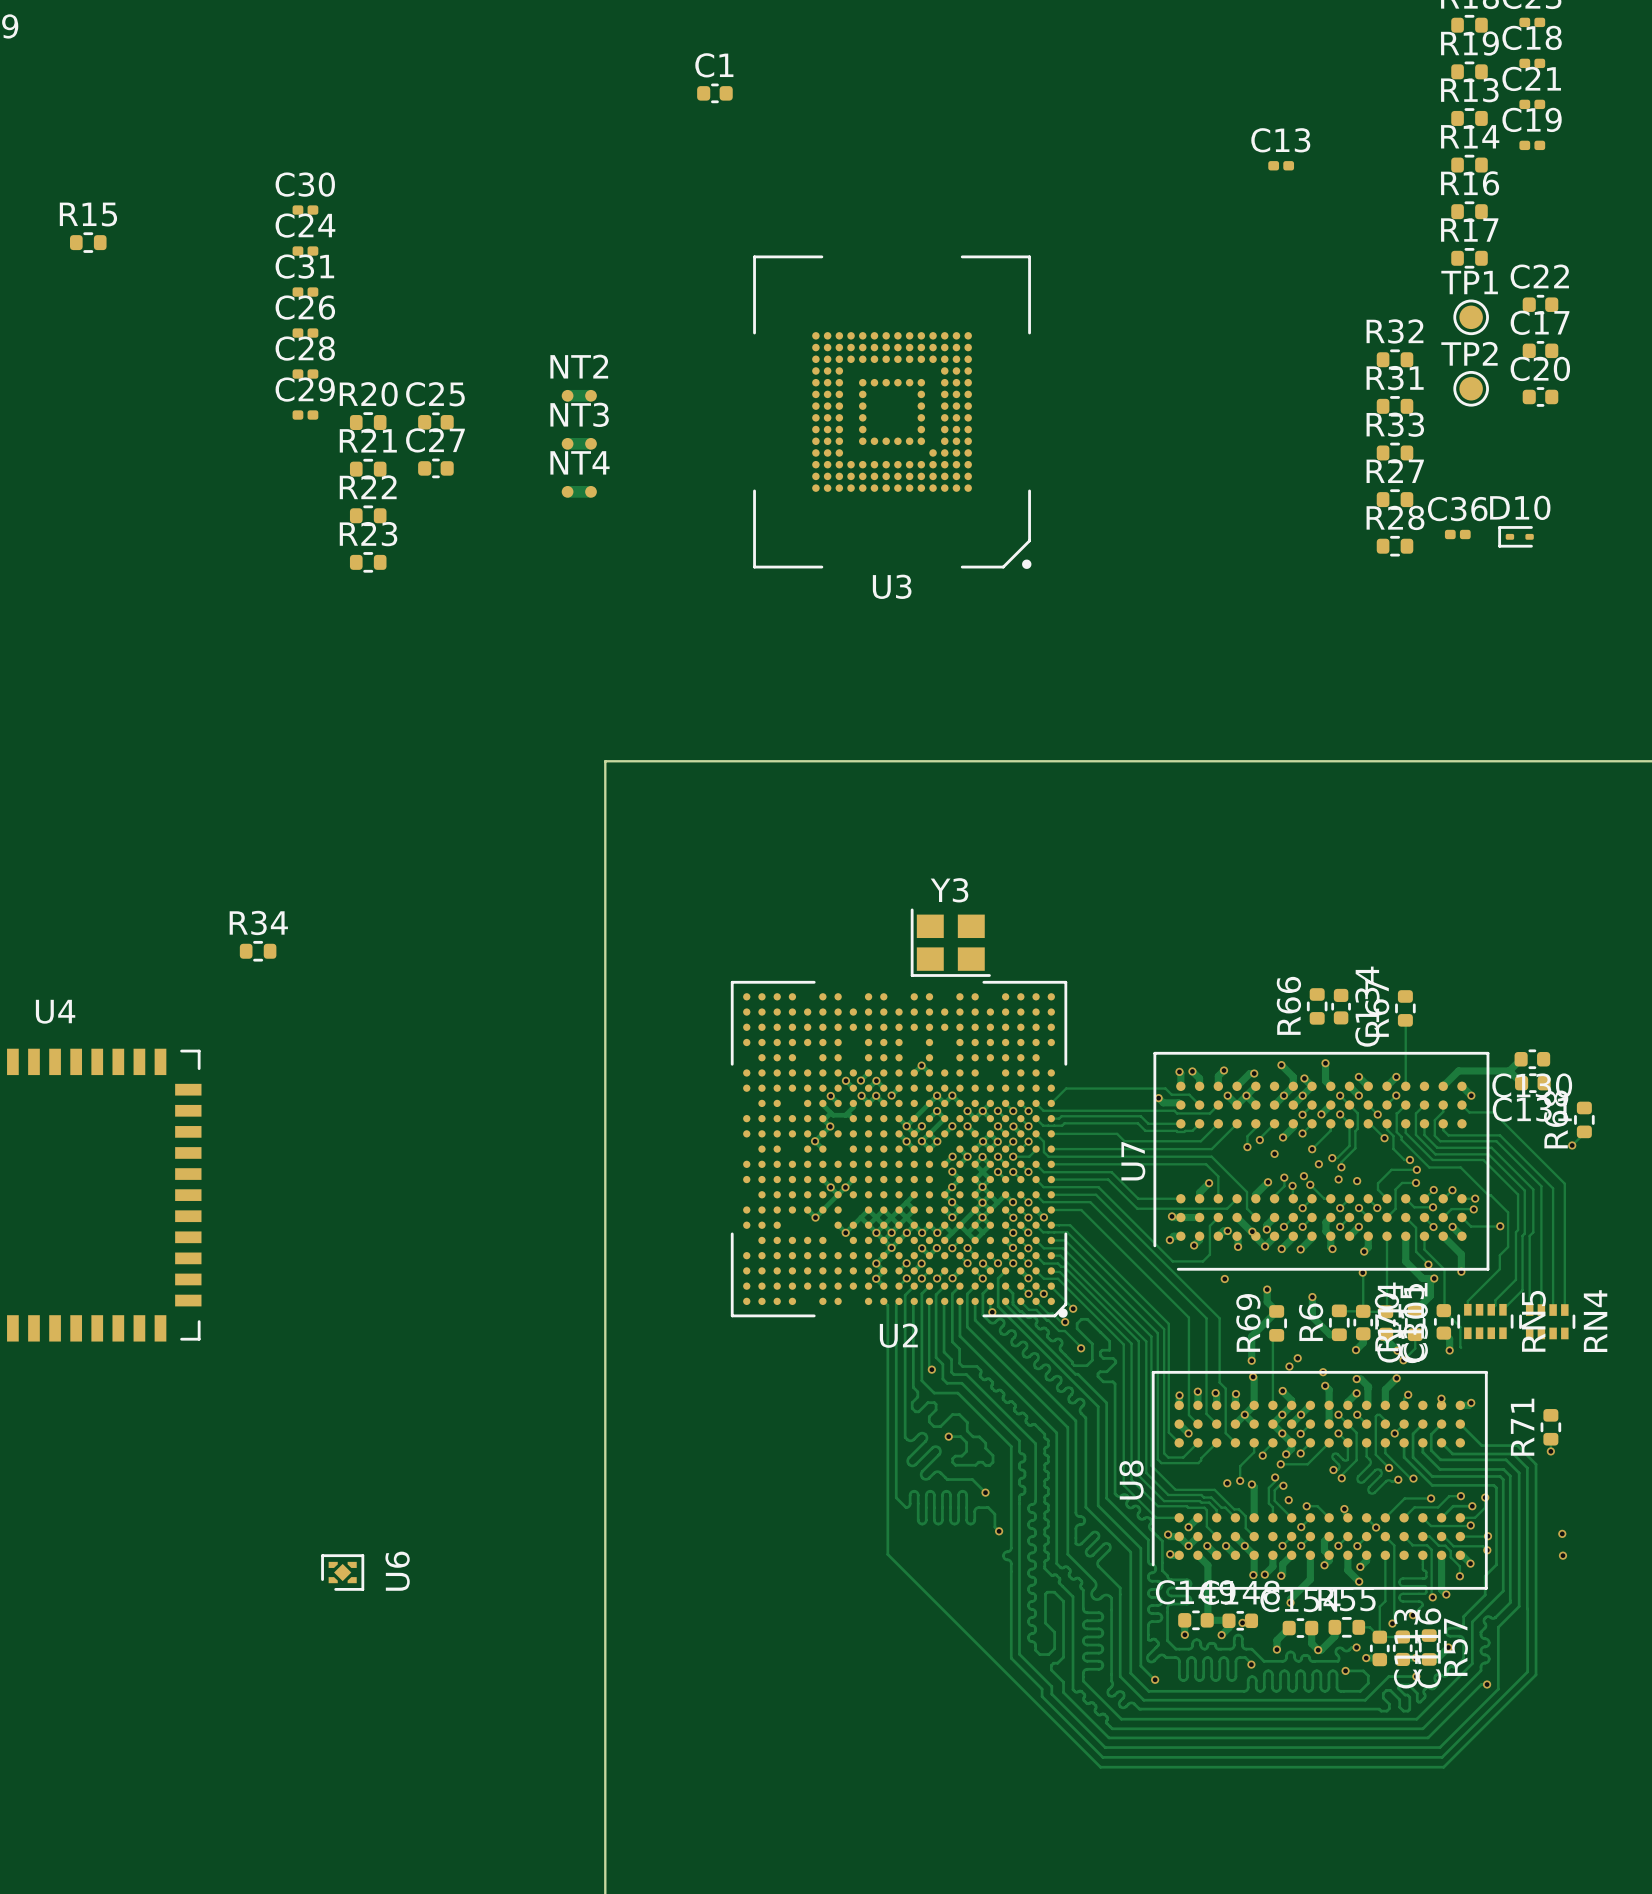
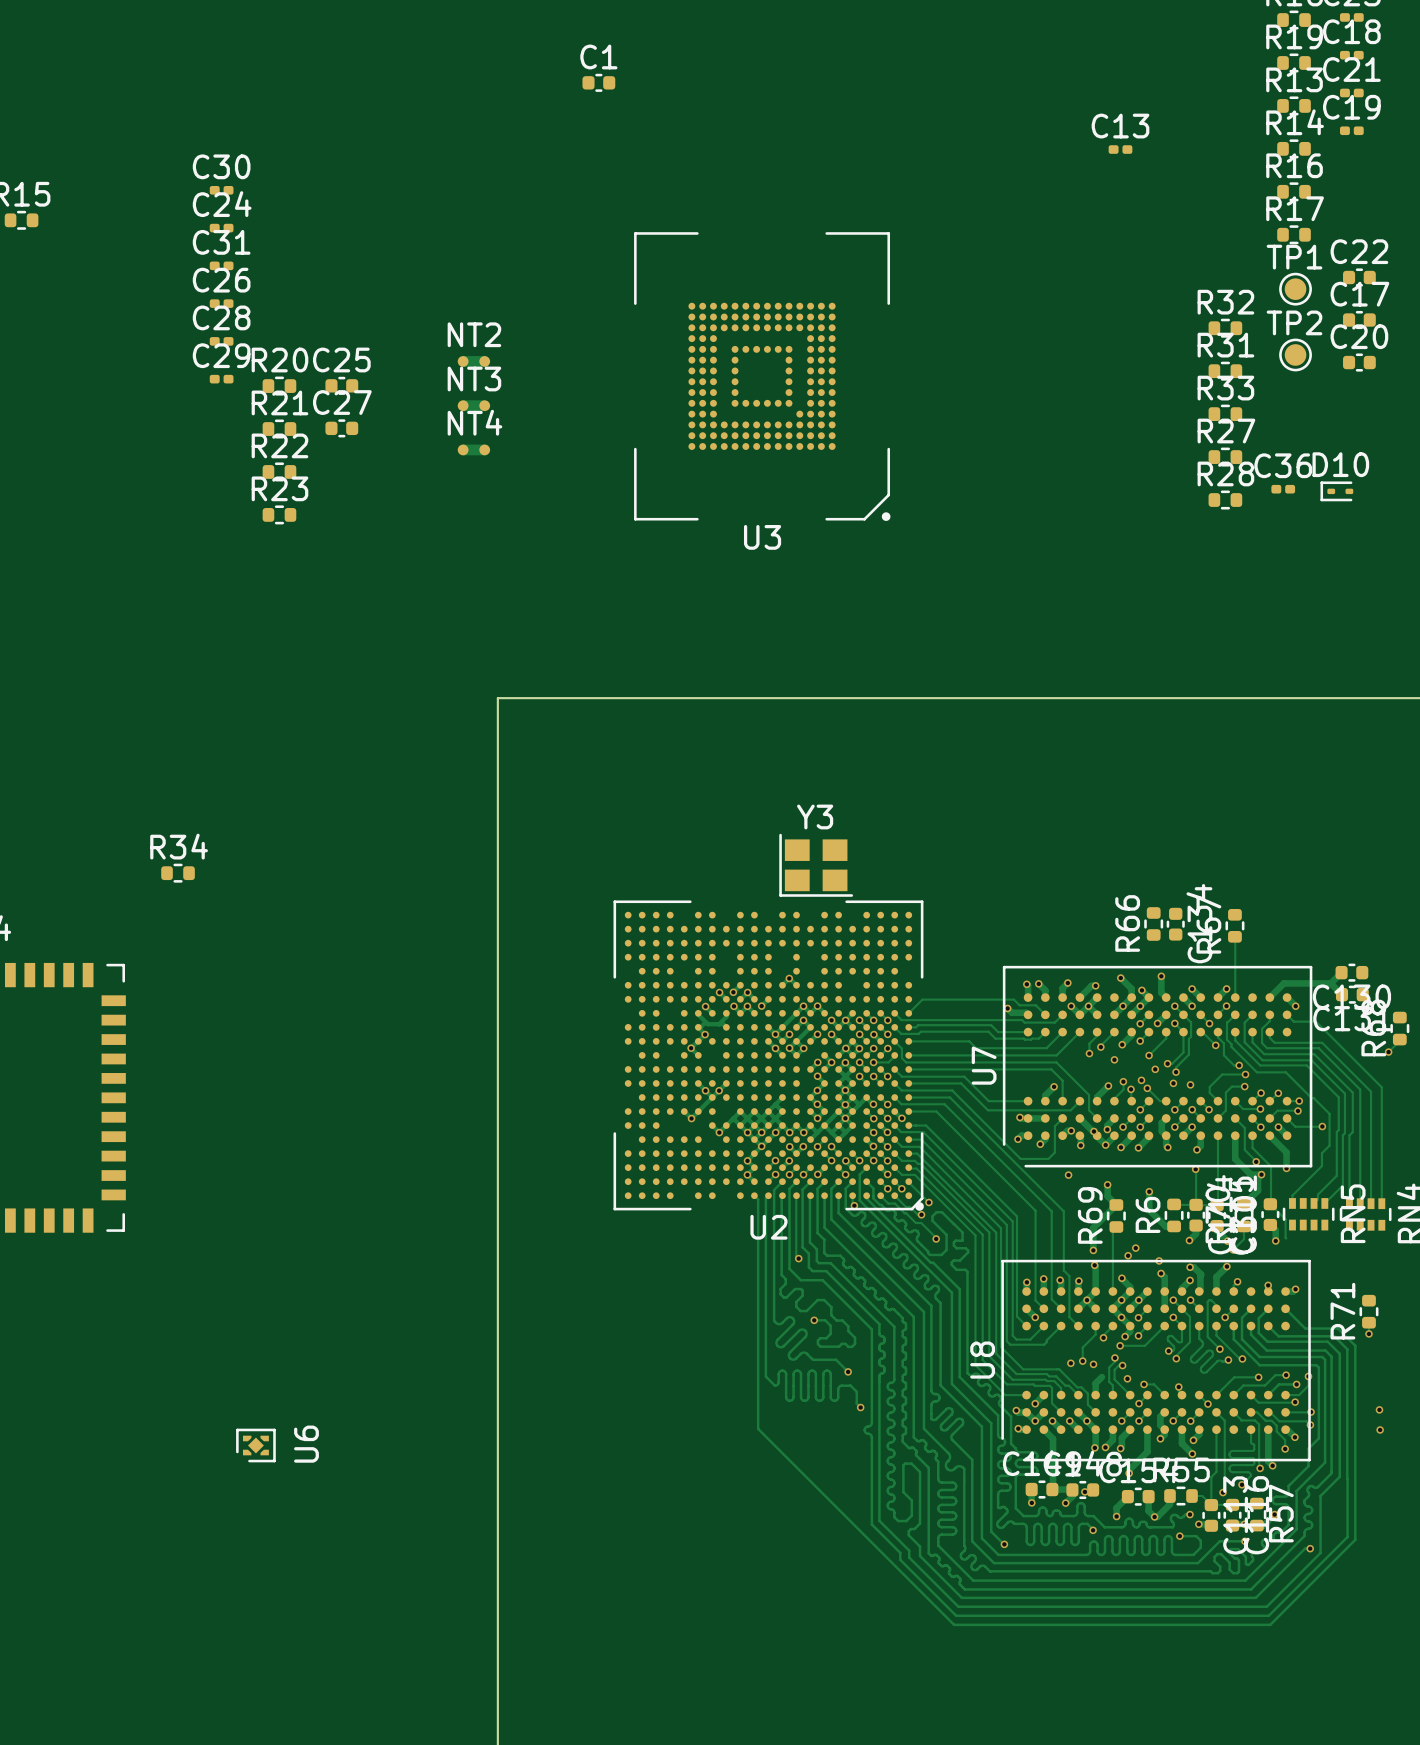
track: (1251, 1484) (1254, 1486) (1254, 1505) -> (1101, 1377) (1095, 1383)

